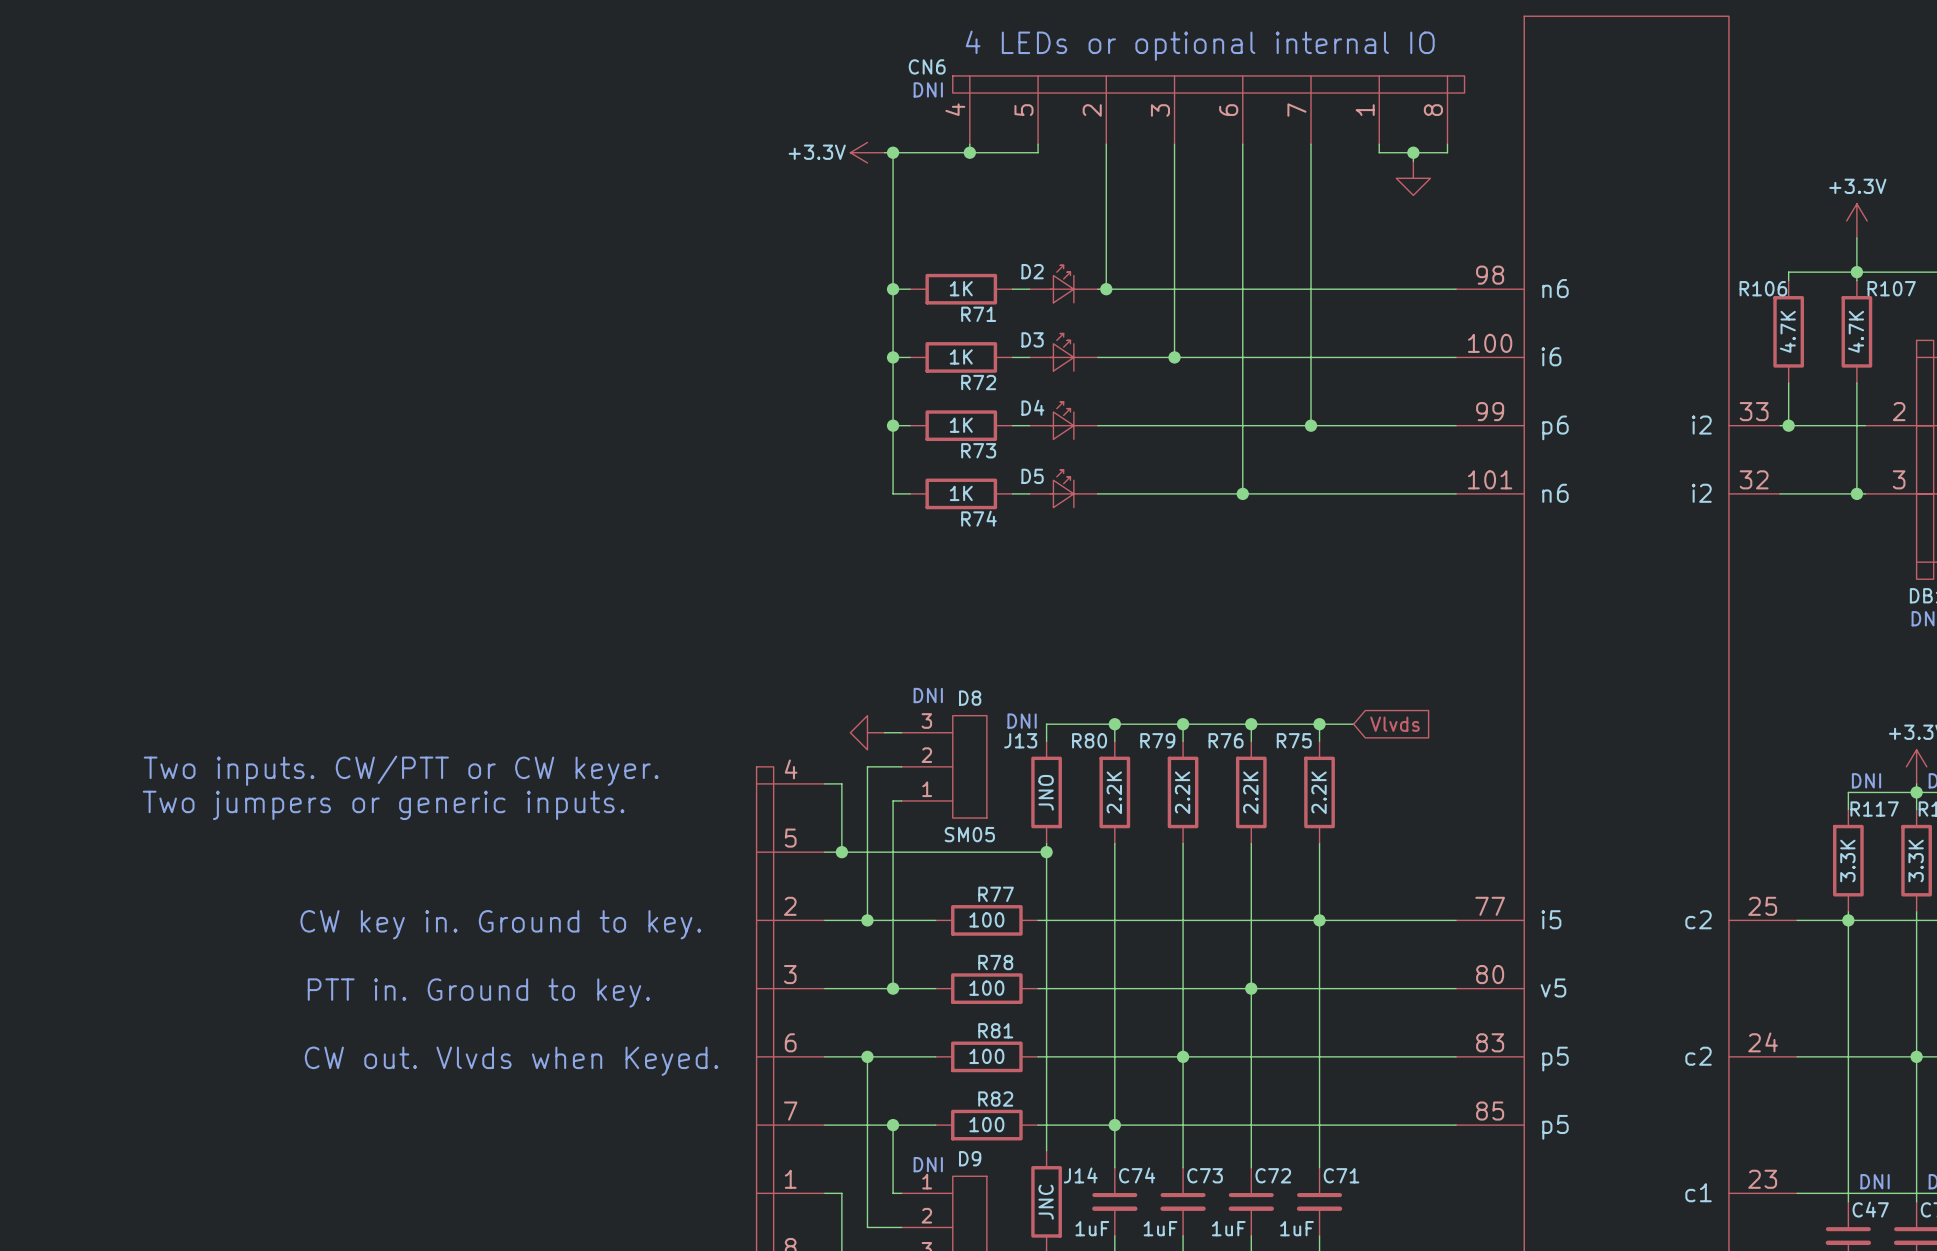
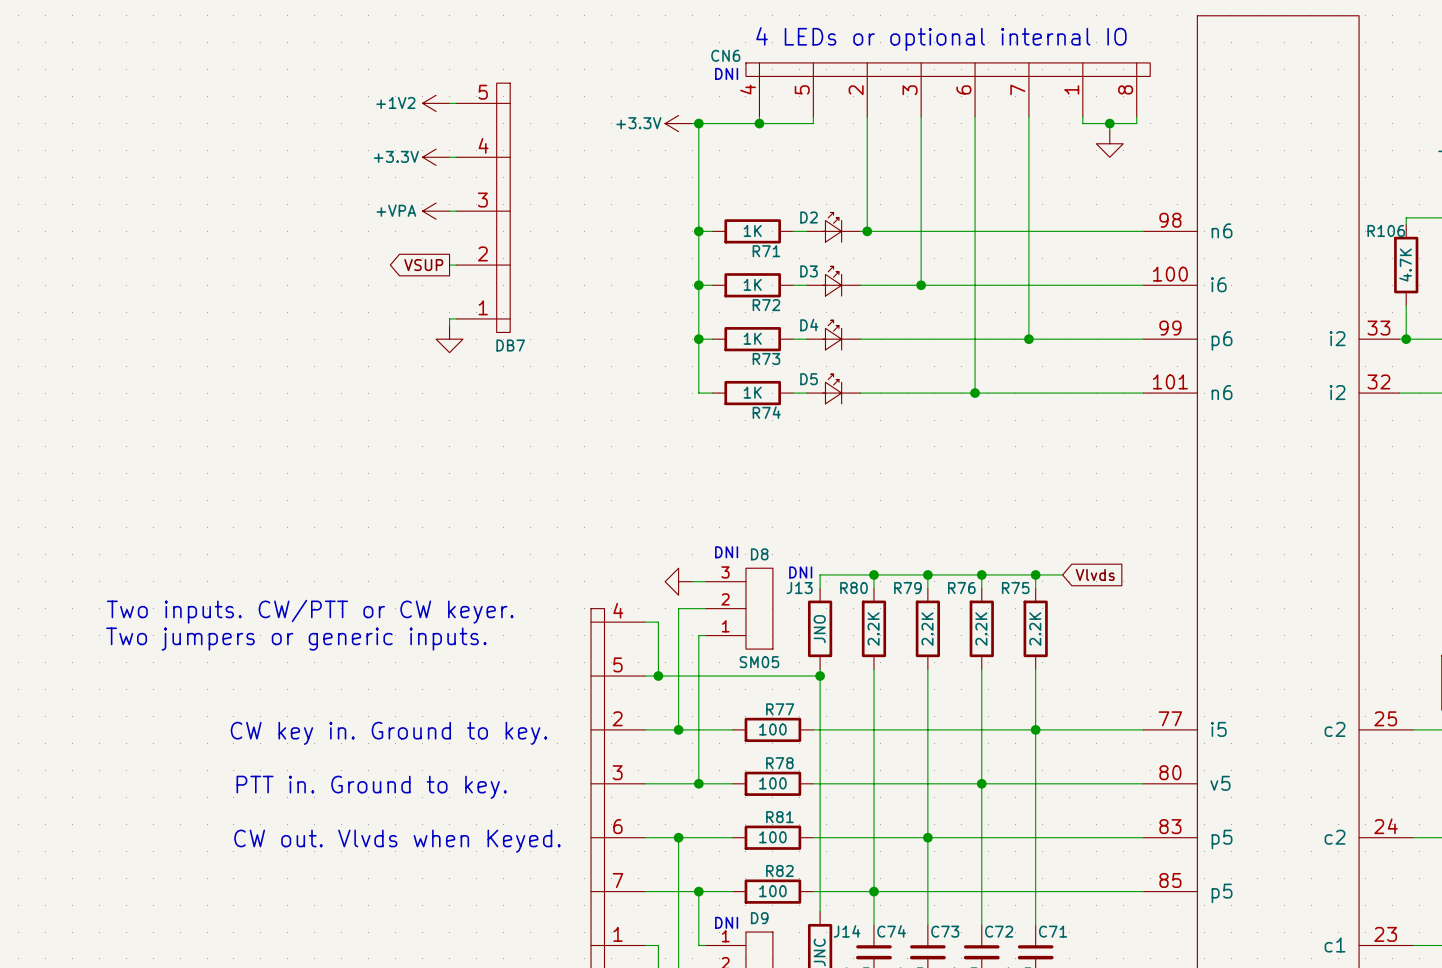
power symbol: none -> +1V2 (436, 103)
wire: none -> (449, 103) (456, 103)
power symbol: none -> +3.3V (436, 157)
wire: none -> (449, 157) (456, 157)
DB7: none -> (483, 207)
power symbol: none -> +VPA (436, 211)
wire: none -> (449, 211) (456, 211)
global label: none -> VSUP (423, 265)
wire: none -> (449, 265) (456, 265)
wire: none -> (456, 318) (449, 318) (449, 325)
power symbol: none -> (449, 339)

